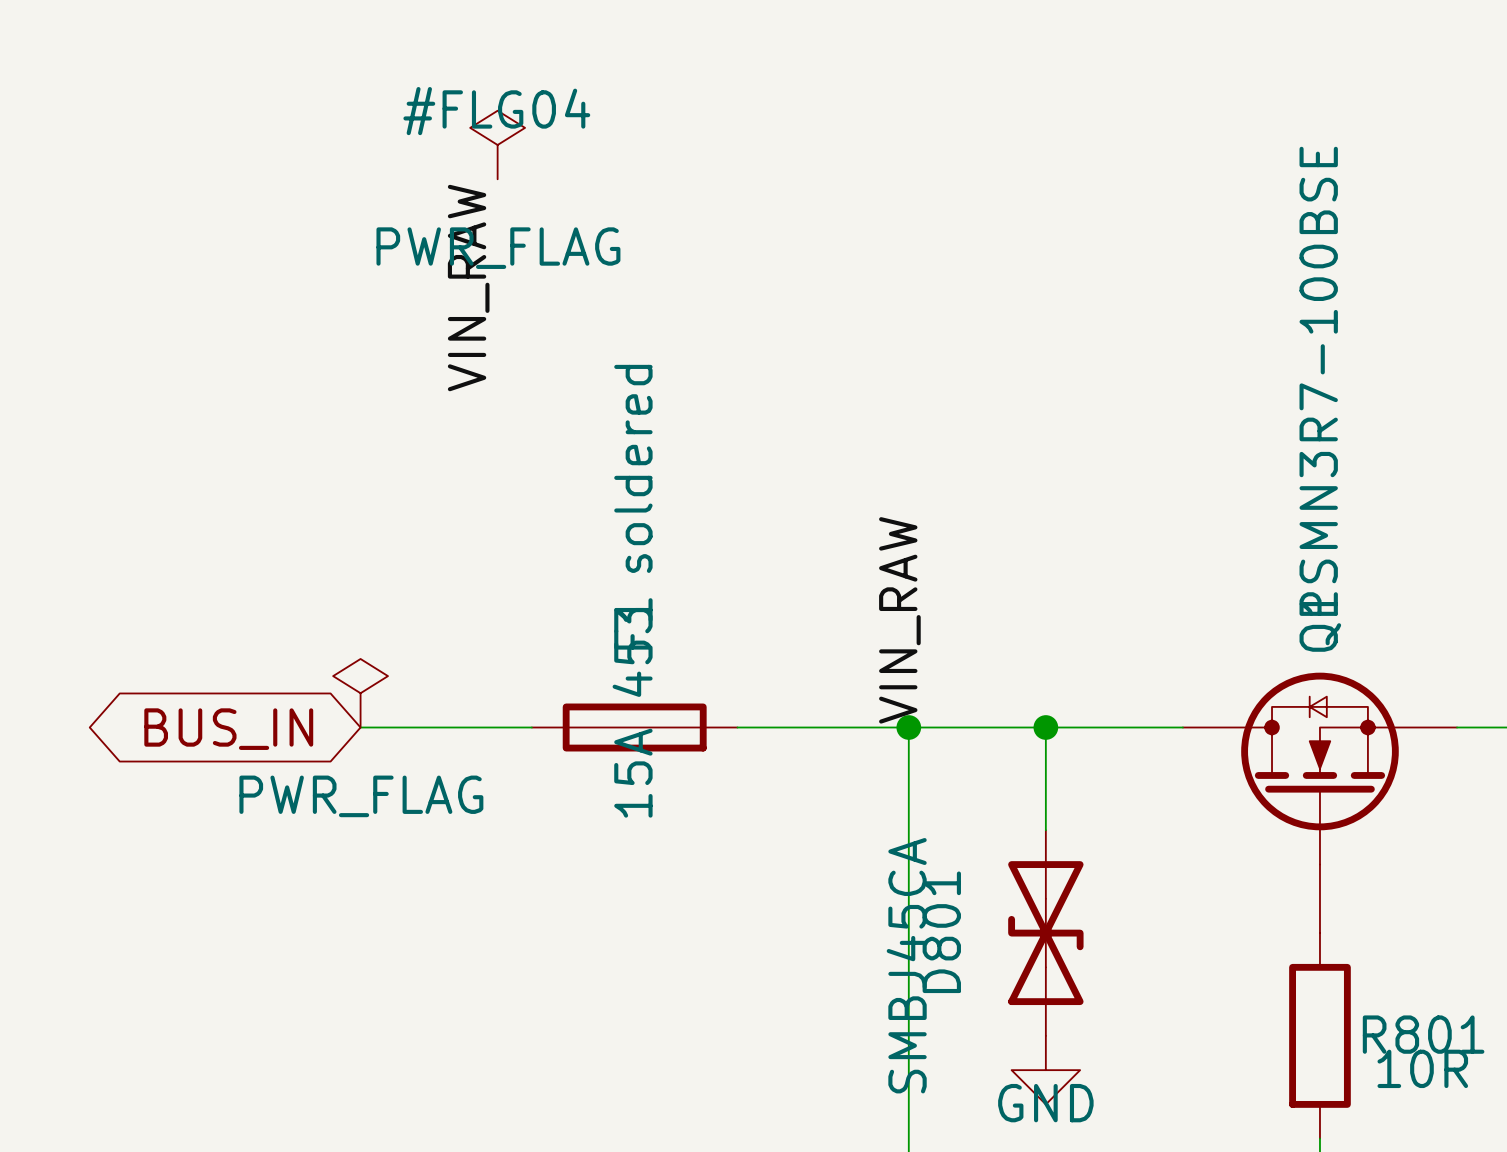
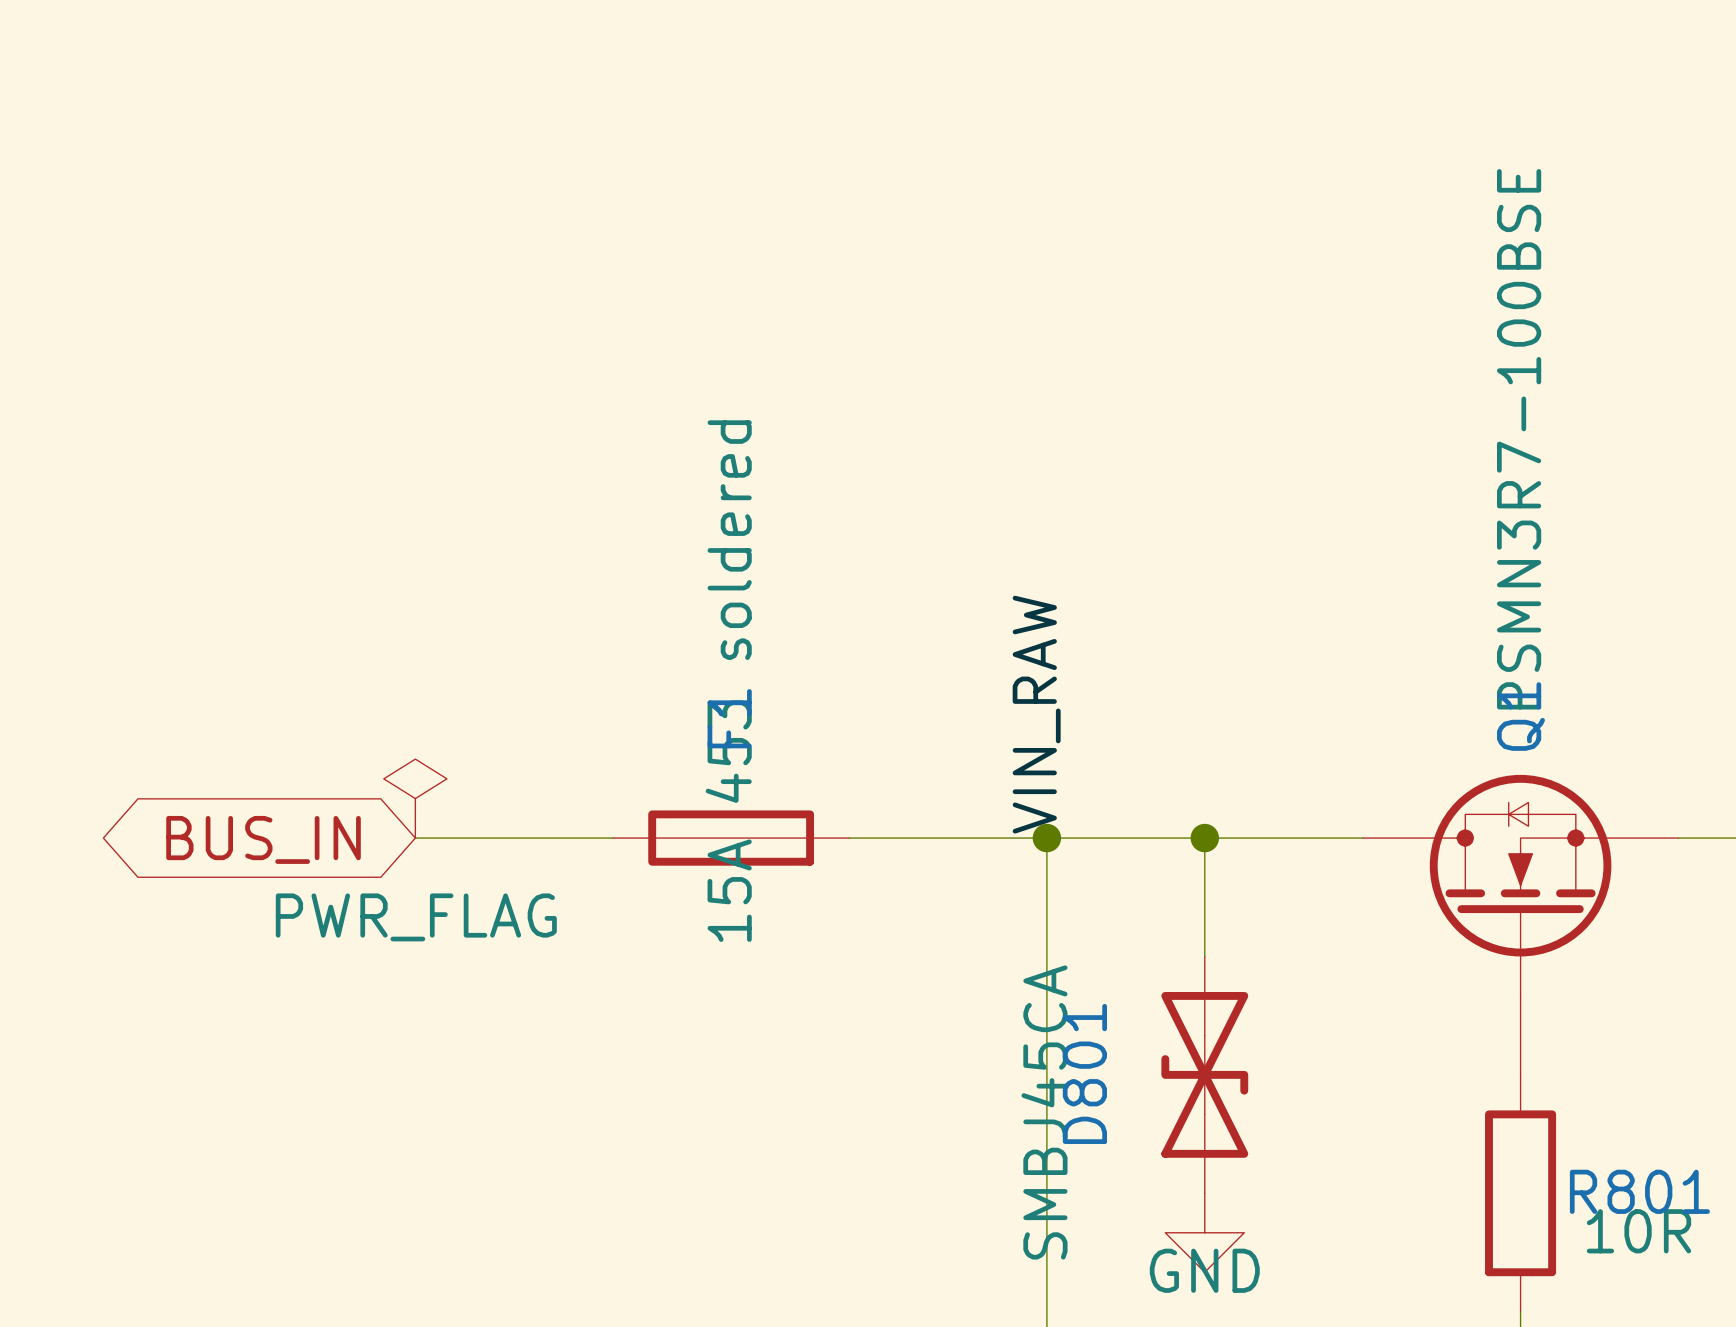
#FLG04: PWR_FLAG (497, 145) -> none
label: VIN_RAW (468, 288) -> none

